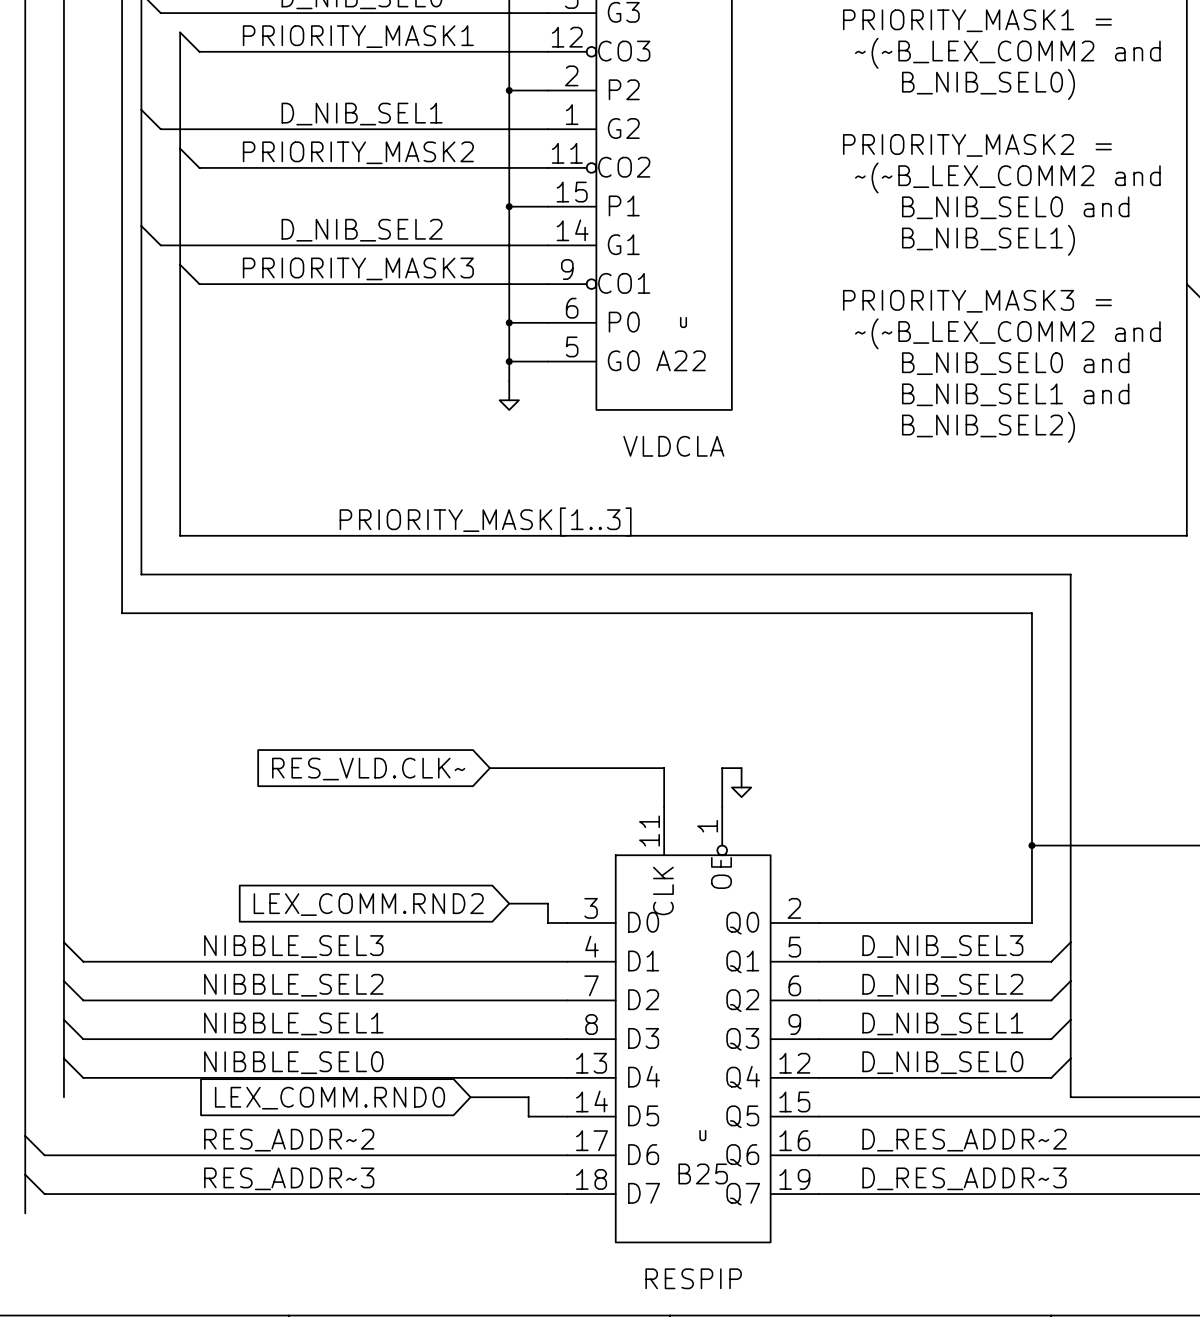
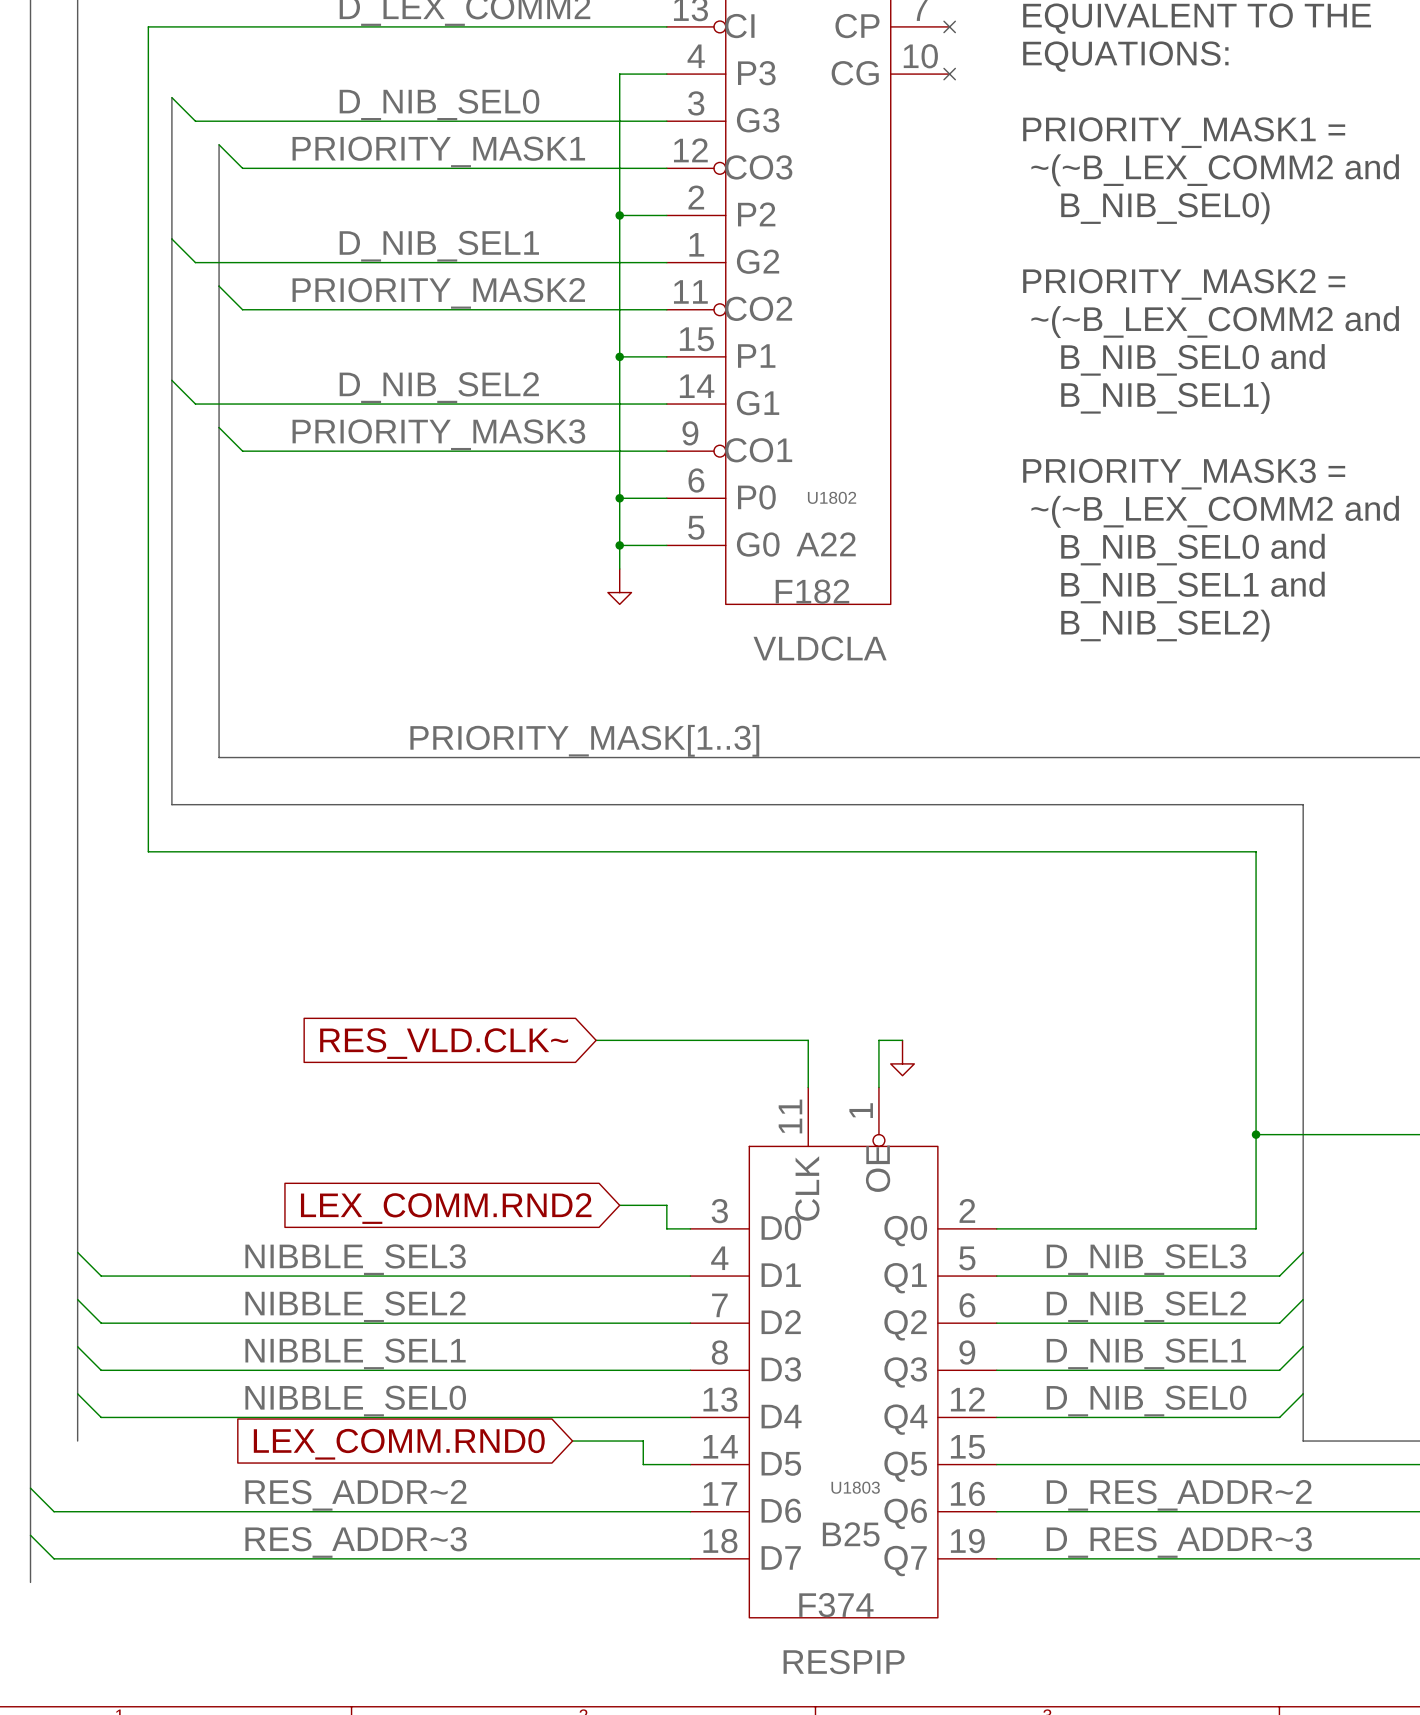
U name: U (683, 322) -> U1802 (832, 497)
U value: none -> F182 (812, 591)
U name: U (702, 1135) -> U1803 (855, 1487)
U value: none -> F374 (836, 1605)

